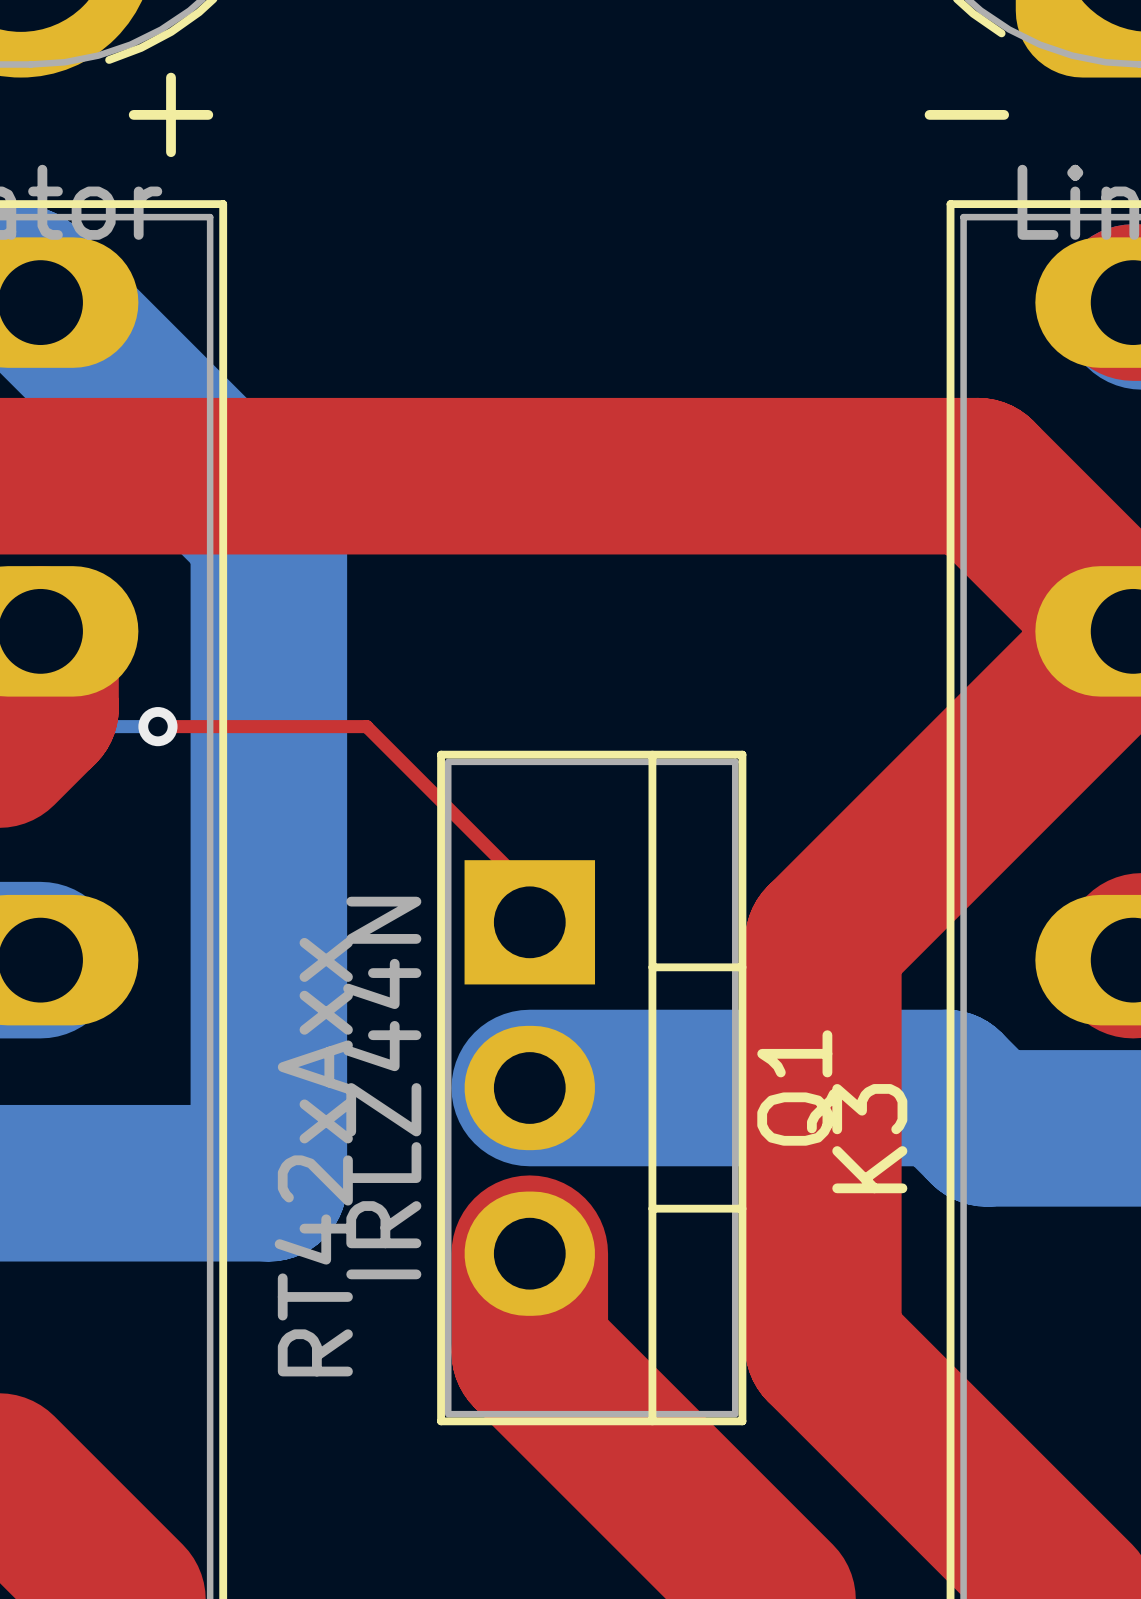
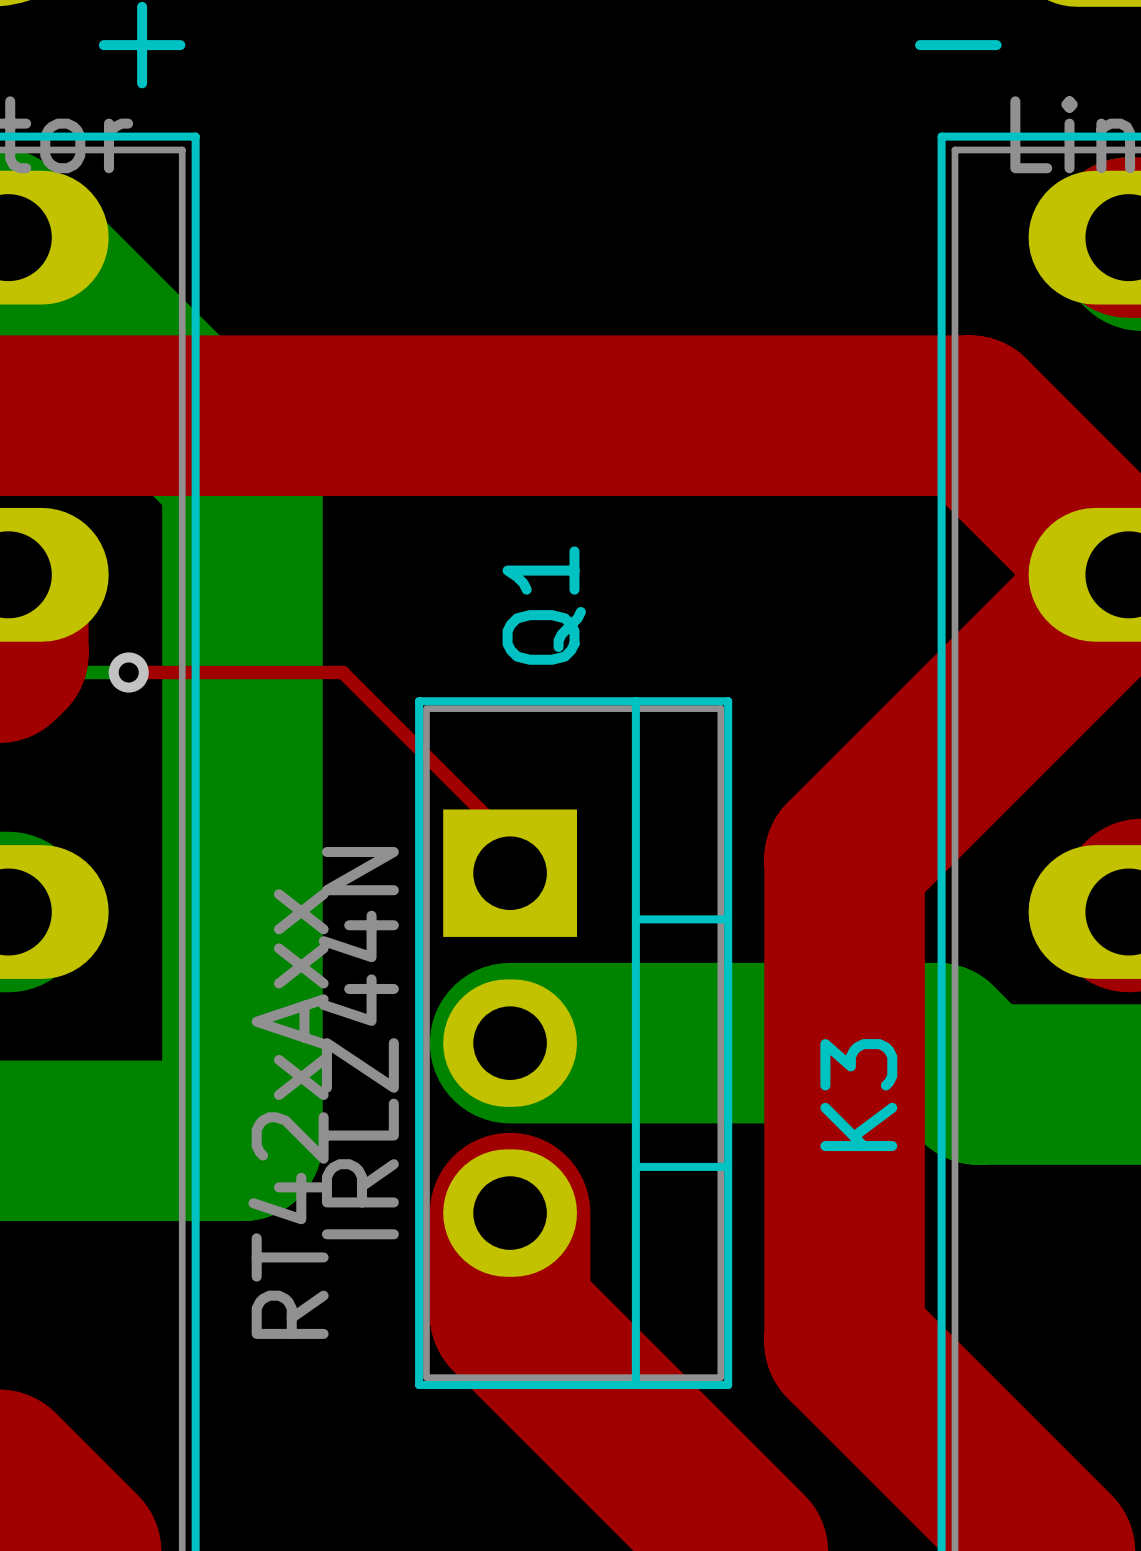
top track: (855, 908) (823, 941) (823, 1346) (855, 1378) -> (844, 859) (844, 1341)
Q1 name position: Q1 (797, 1088) -> Q1 (544, 605)

